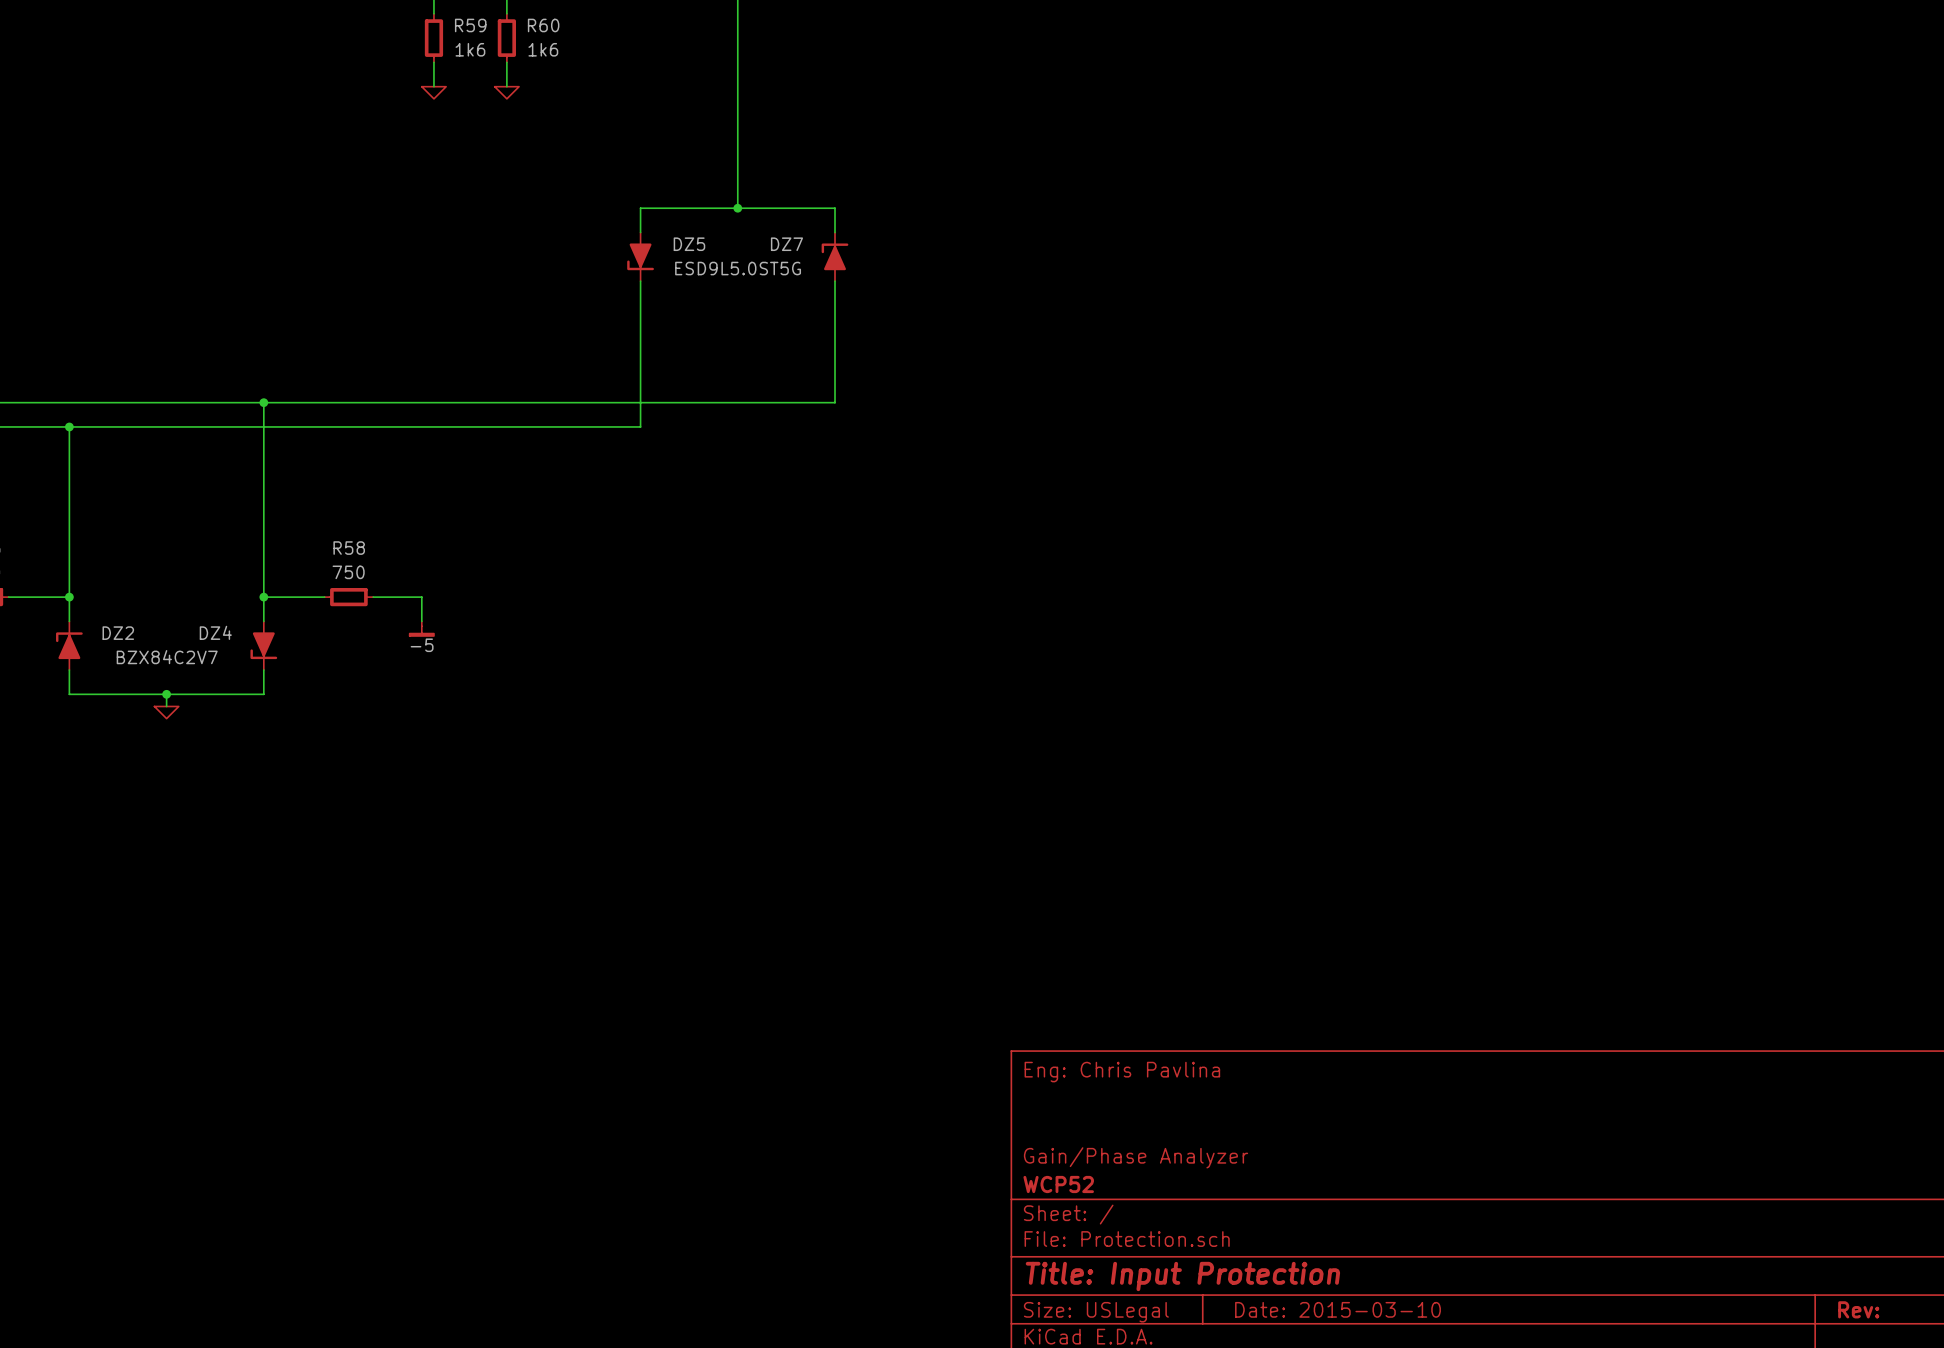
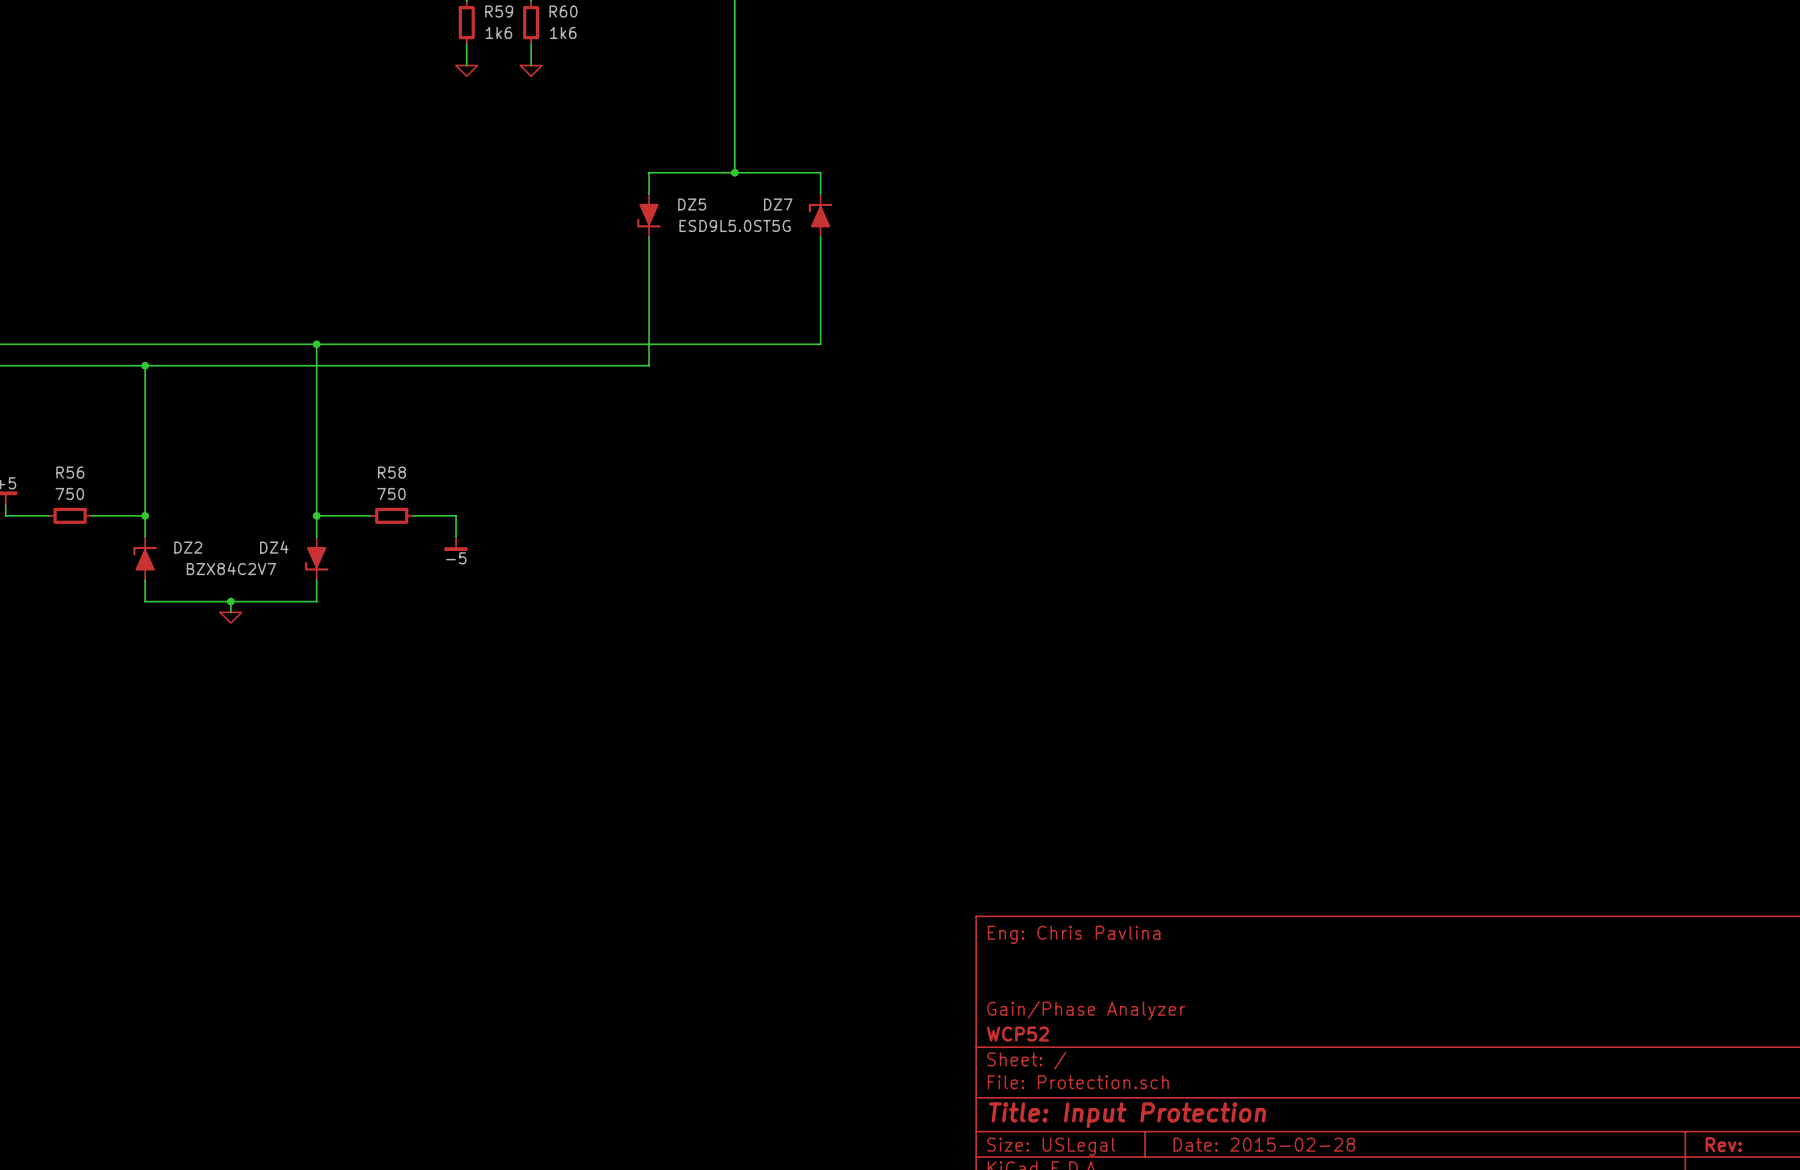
title block: Date: 2015-03-10 (1338, 1309) -> Date: 2015-02-28 (1264, 1144)

